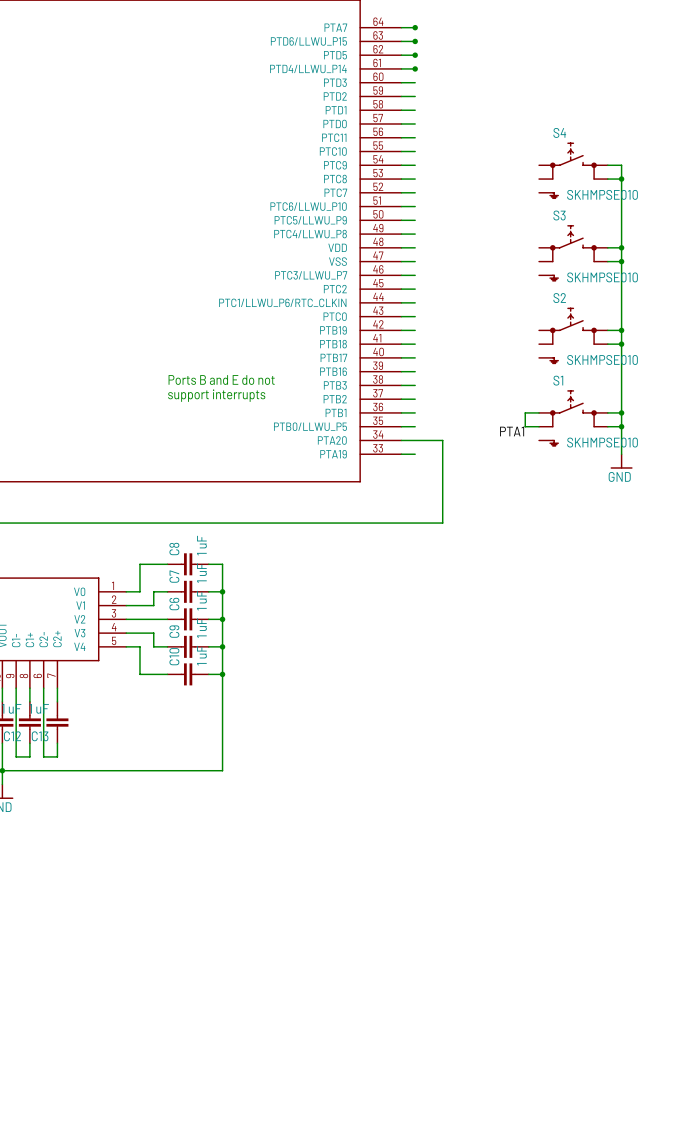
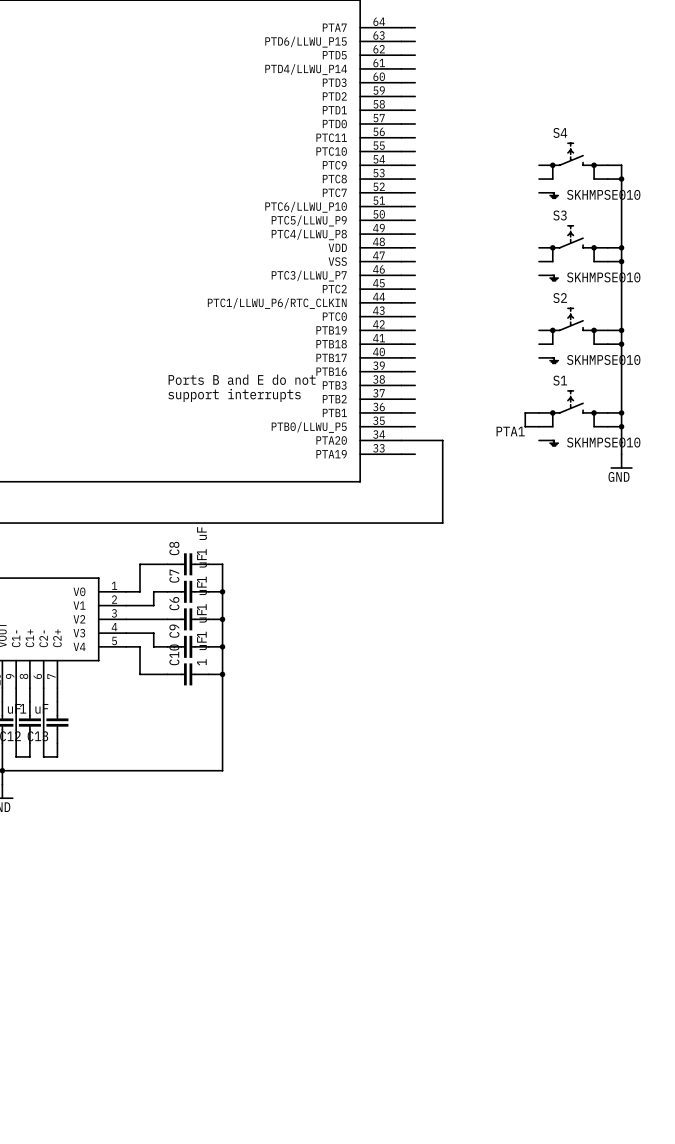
junction: (415, 27) -> none
junction: (415, 41) -> none
junction: (415, 55) -> none
junction: (415, 68) -> none

